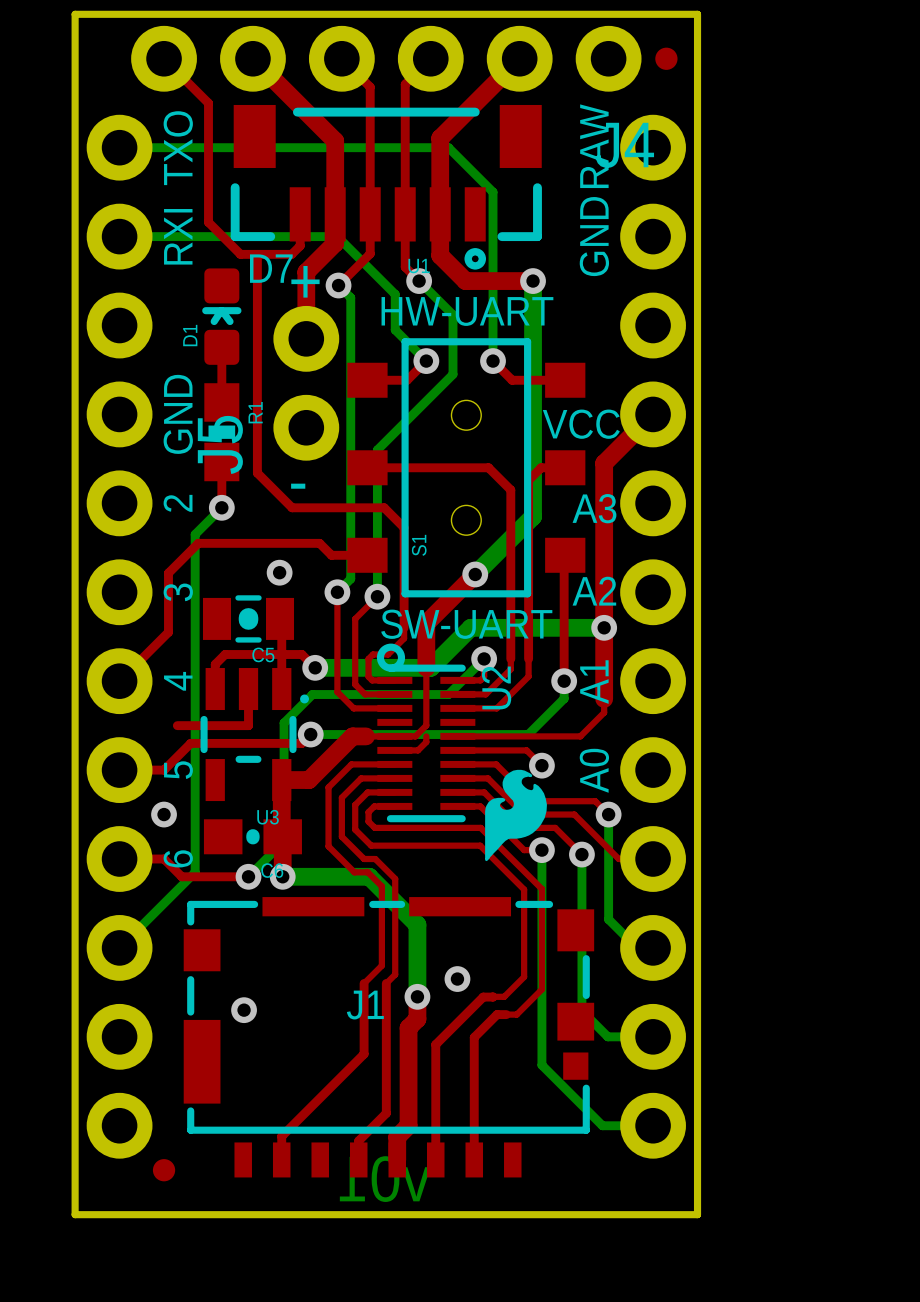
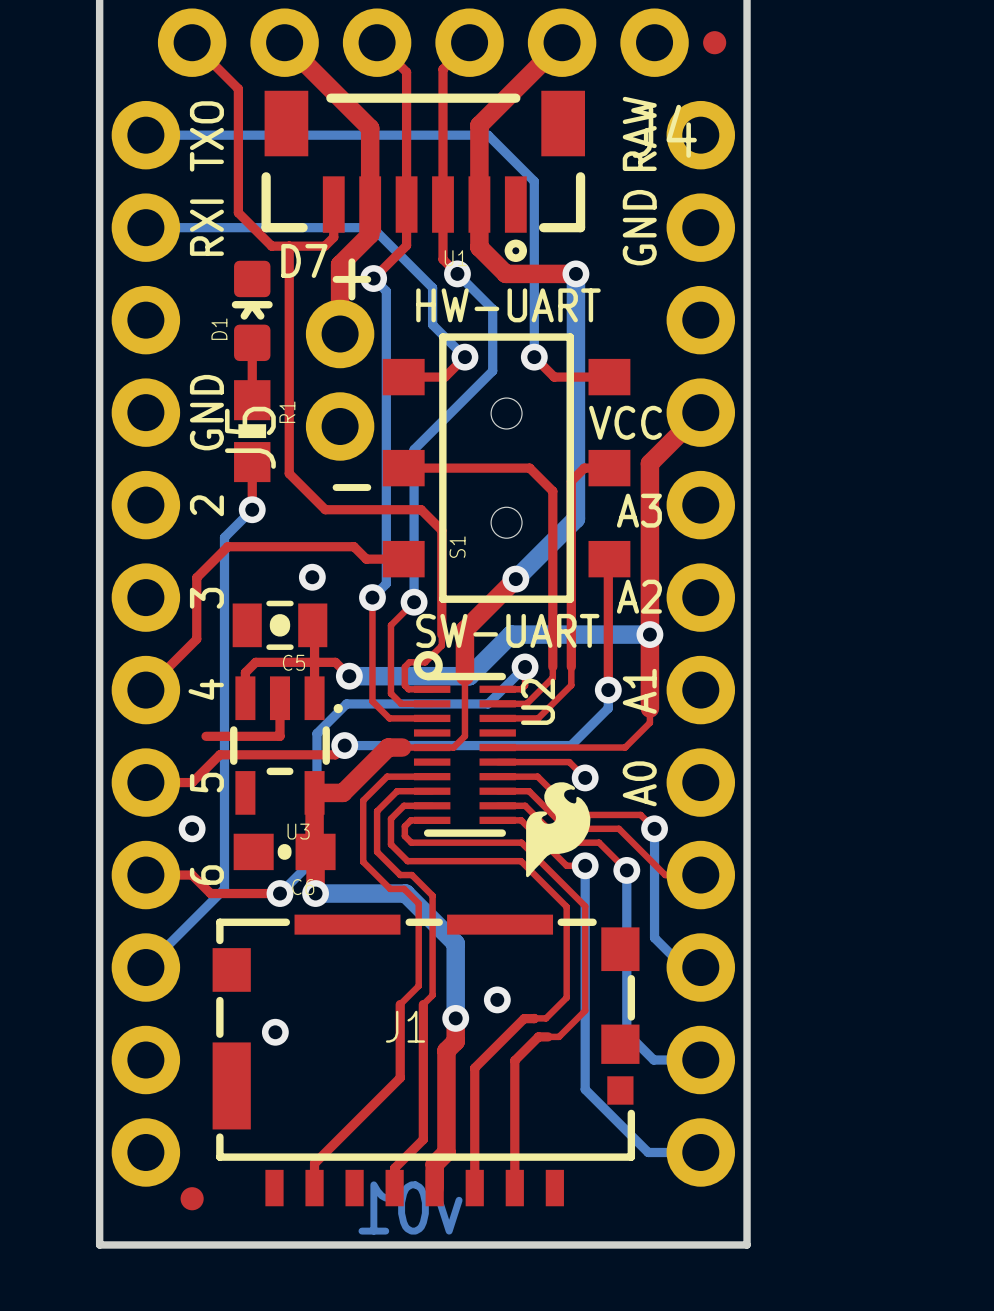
top track: (426, 736) (426, 742) (418, 750) (394, 750) -> none

